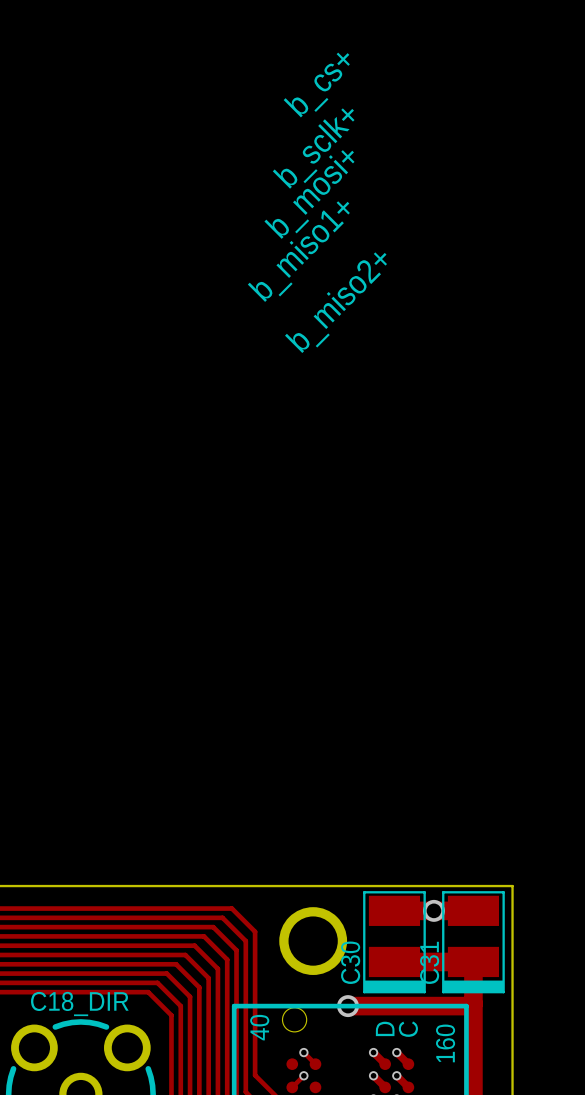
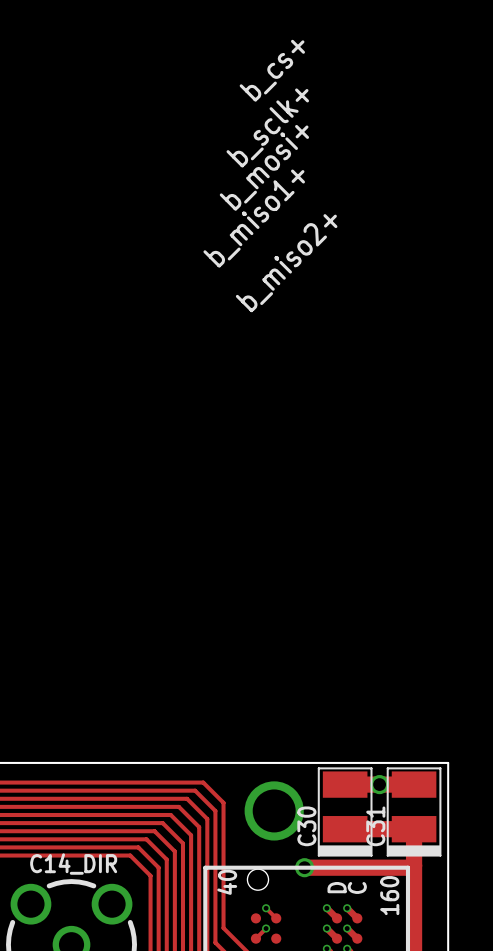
C18_DIR name: C18_DIR (79, 1004) -> C14_DIR (73, 864)

